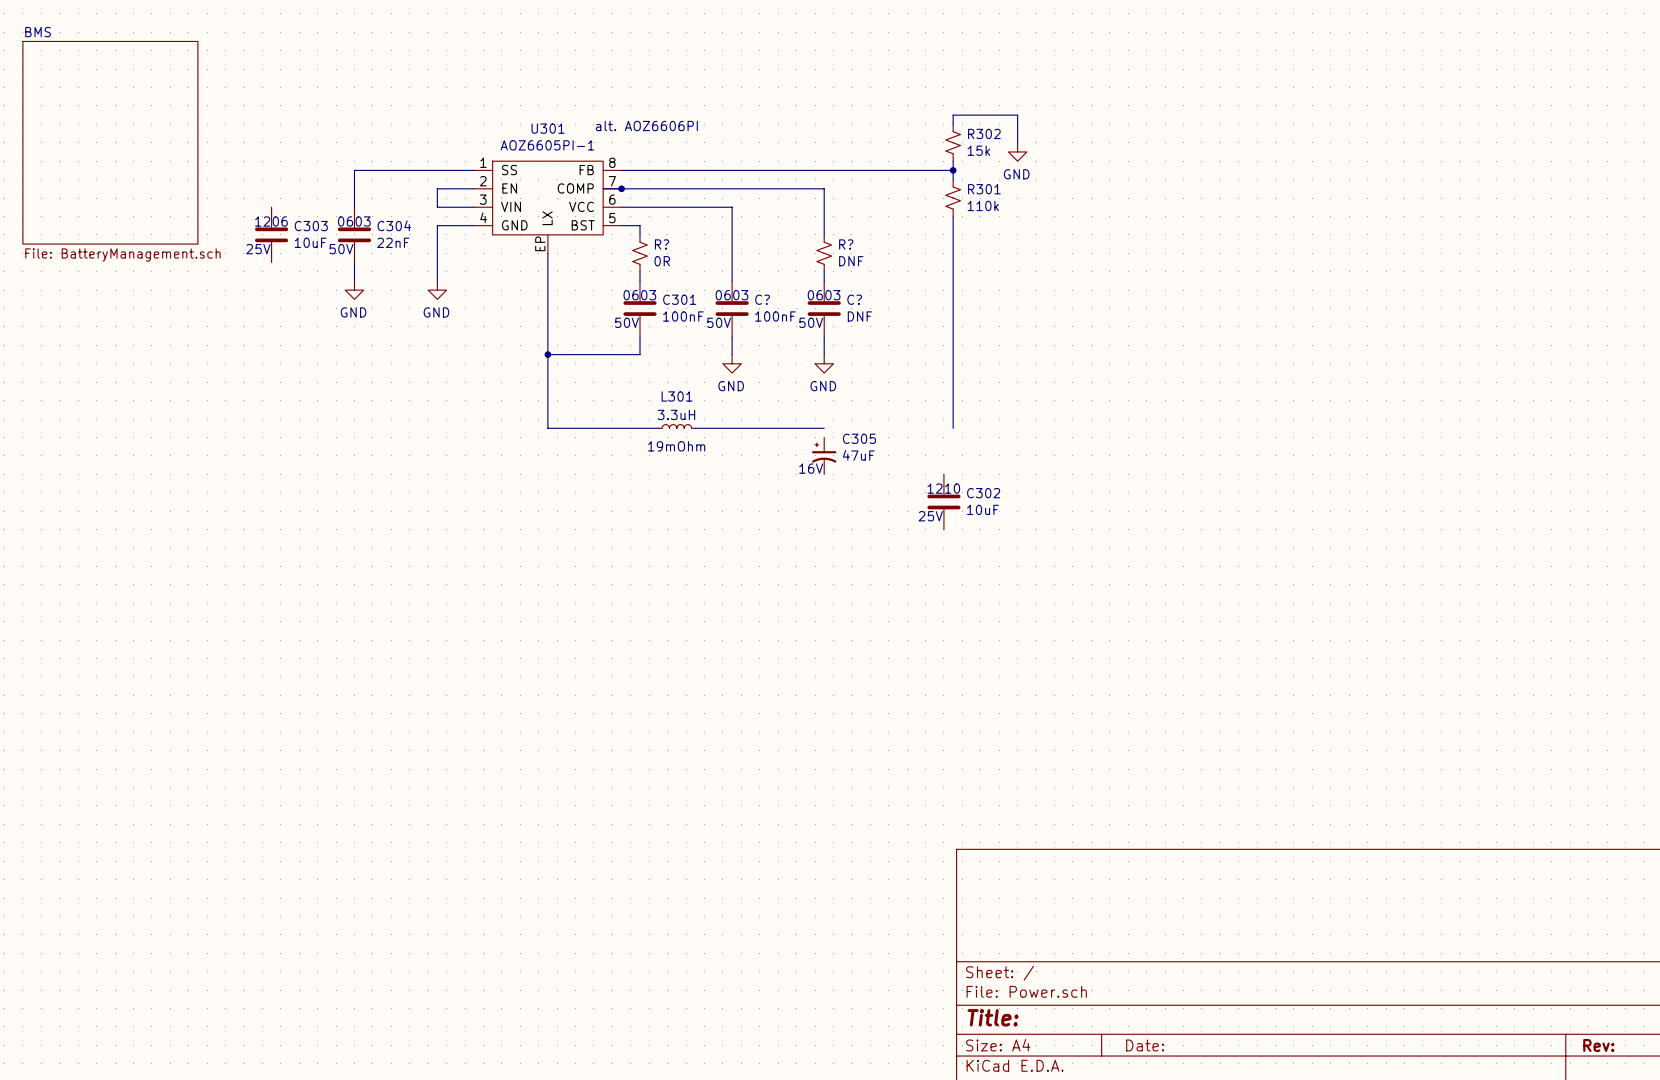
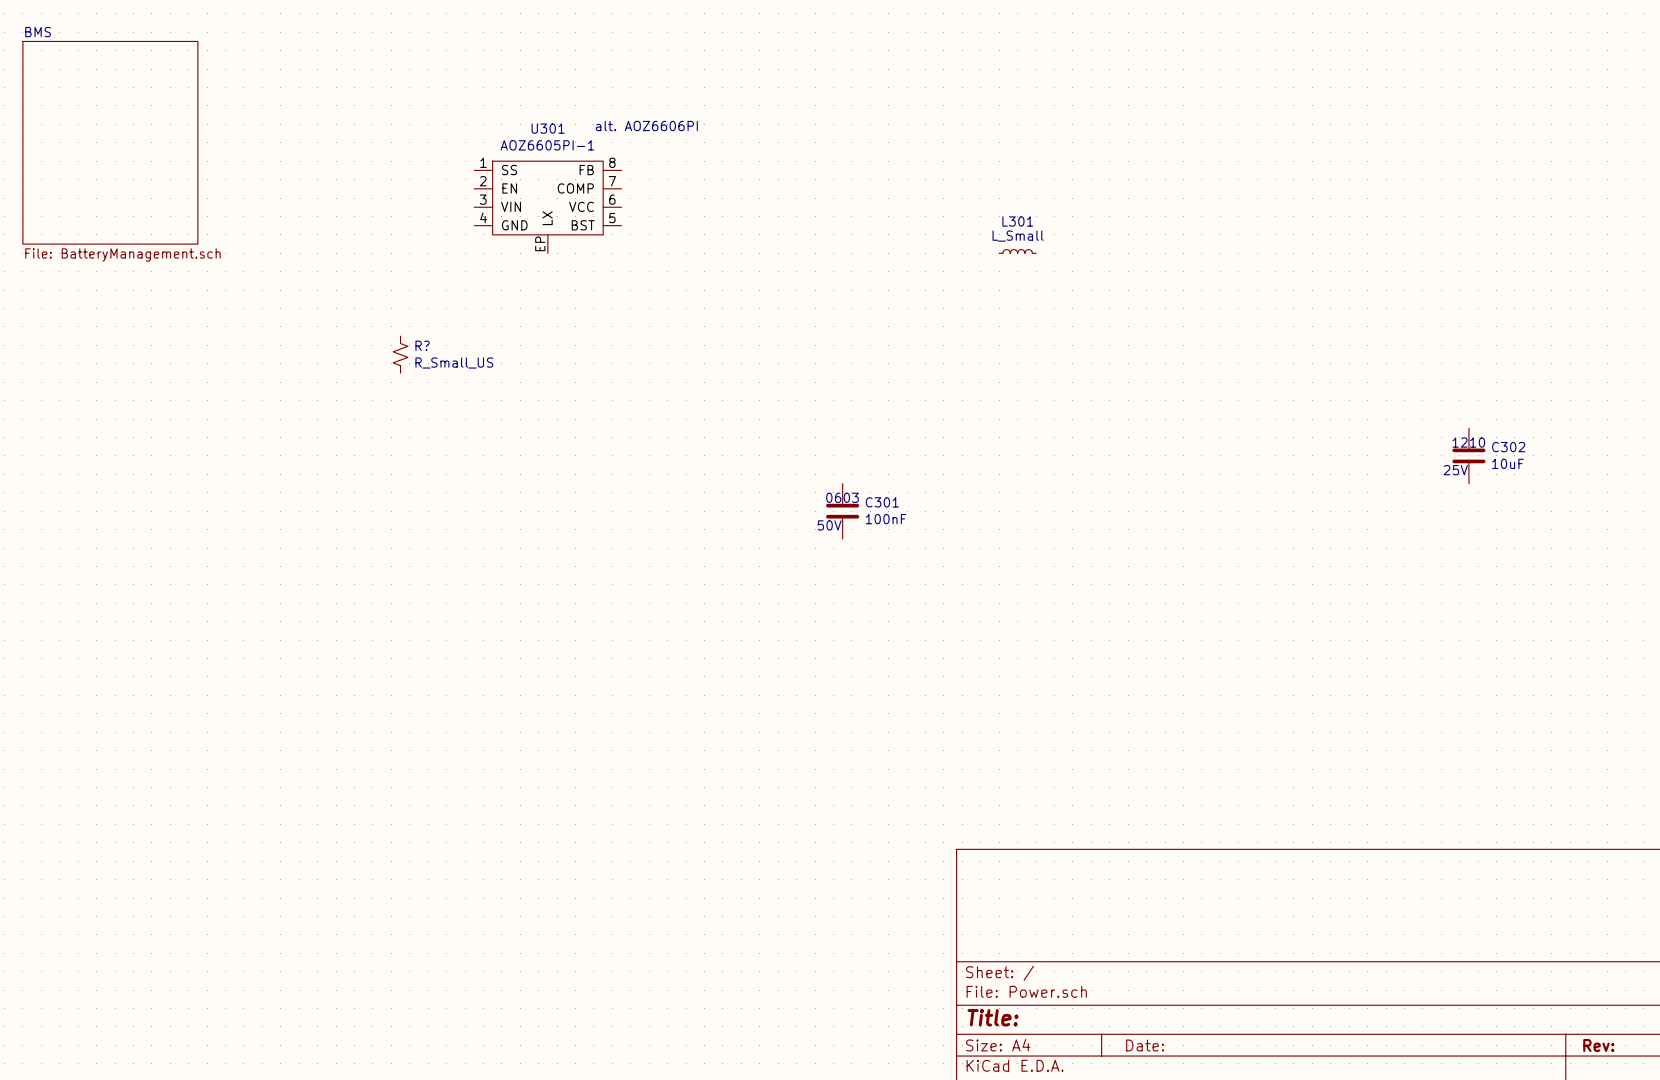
wire: (953, 124) (953, 115) (1017, 115) (1017, 142) -> none
R302: 15k (953, 142) -> none
power symbol: GND (1017, 151) -> none
wire: (953, 161) (953, 179) -> none
wire: (474, 170) (354, 170) (354, 207) -> none
wire: (621, 170) (953, 170) -> none
junction: (953, 170) -> none
wire: (474, 188) (437, 188) (437, 207) (474, 207) -> none
wire: (603, 188) (824, 188) (824, 234) -> none
junction: (621, 188) -> none
R301: 110k (953, 198) -> none
wire: (621, 207) (732, 207) (732, 280) -> none
wire: (953, 216) (953, 428) -> none
wire: (474, 225) (437, 225) (437, 280) -> none
wire: (621, 225) (640, 225) (640, 234) -> none
C303: 10uF (271, 234) -> none
C304: 22nF (354, 234) -> none
wire: (547, 253) (547, 428) (658, 428) -> none
R?: 0R (640, 253) -> none
R?: DNF (824, 253) -> none
wire: (354, 262) (354, 280) -> none
wire: (640, 271) (640, 280) -> none
wire: (824, 271) (824, 280) -> none
power symbol: GND (354, 290) -> none
power symbol: GND (437, 290) -> none
C301 position: (640, 308) -> (842, 511)
C?: 100nF (732, 308) -> none
C?: DNF (824, 308) -> none
wire: (640, 336) (640, 354) (547, 354) -> none
wire: (732, 336) (732, 354) -> none
wire: (824, 336) (824, 354) -> none
R?: none -> R_Small_US (400, 354)
junction: (547, 354) -> none
power symbol: GND (732, 363) -> none
power symbol: GND (824, 363) -> none
L301 value: 3.3uH (676, 414) -> L_Small (1018, 236)
L301 position: (676, 426) -> (1017, 251)
wire: (695, 428) (824, 428) -> none
L301 text: 19mOhm (676, 446) -> none
C305: 47uF (824, 455) -> none
C302 position: (943, 501) -> (1468, 455)

